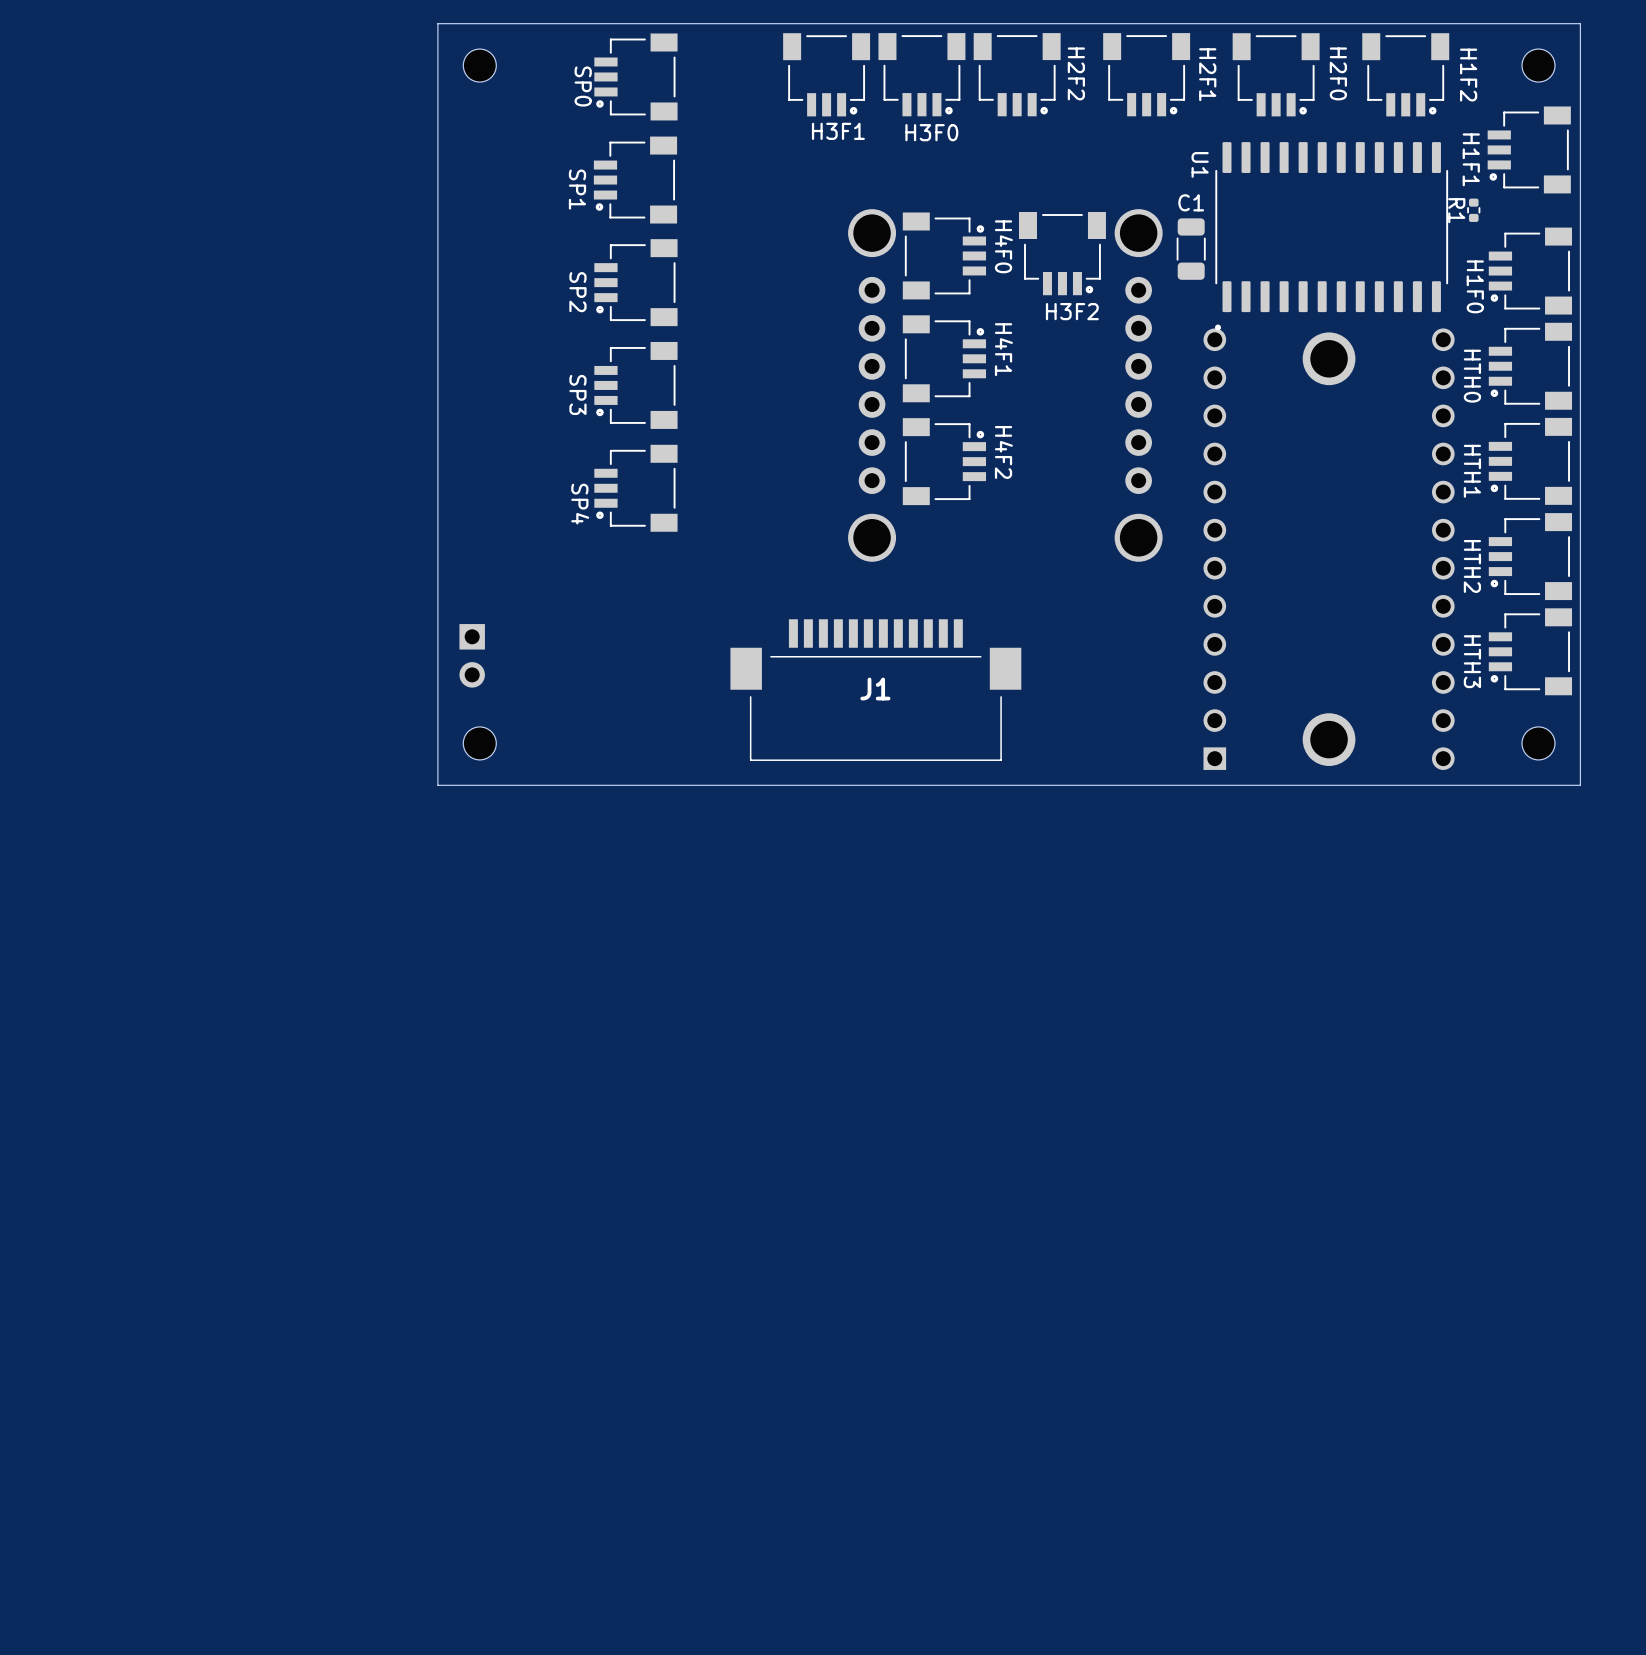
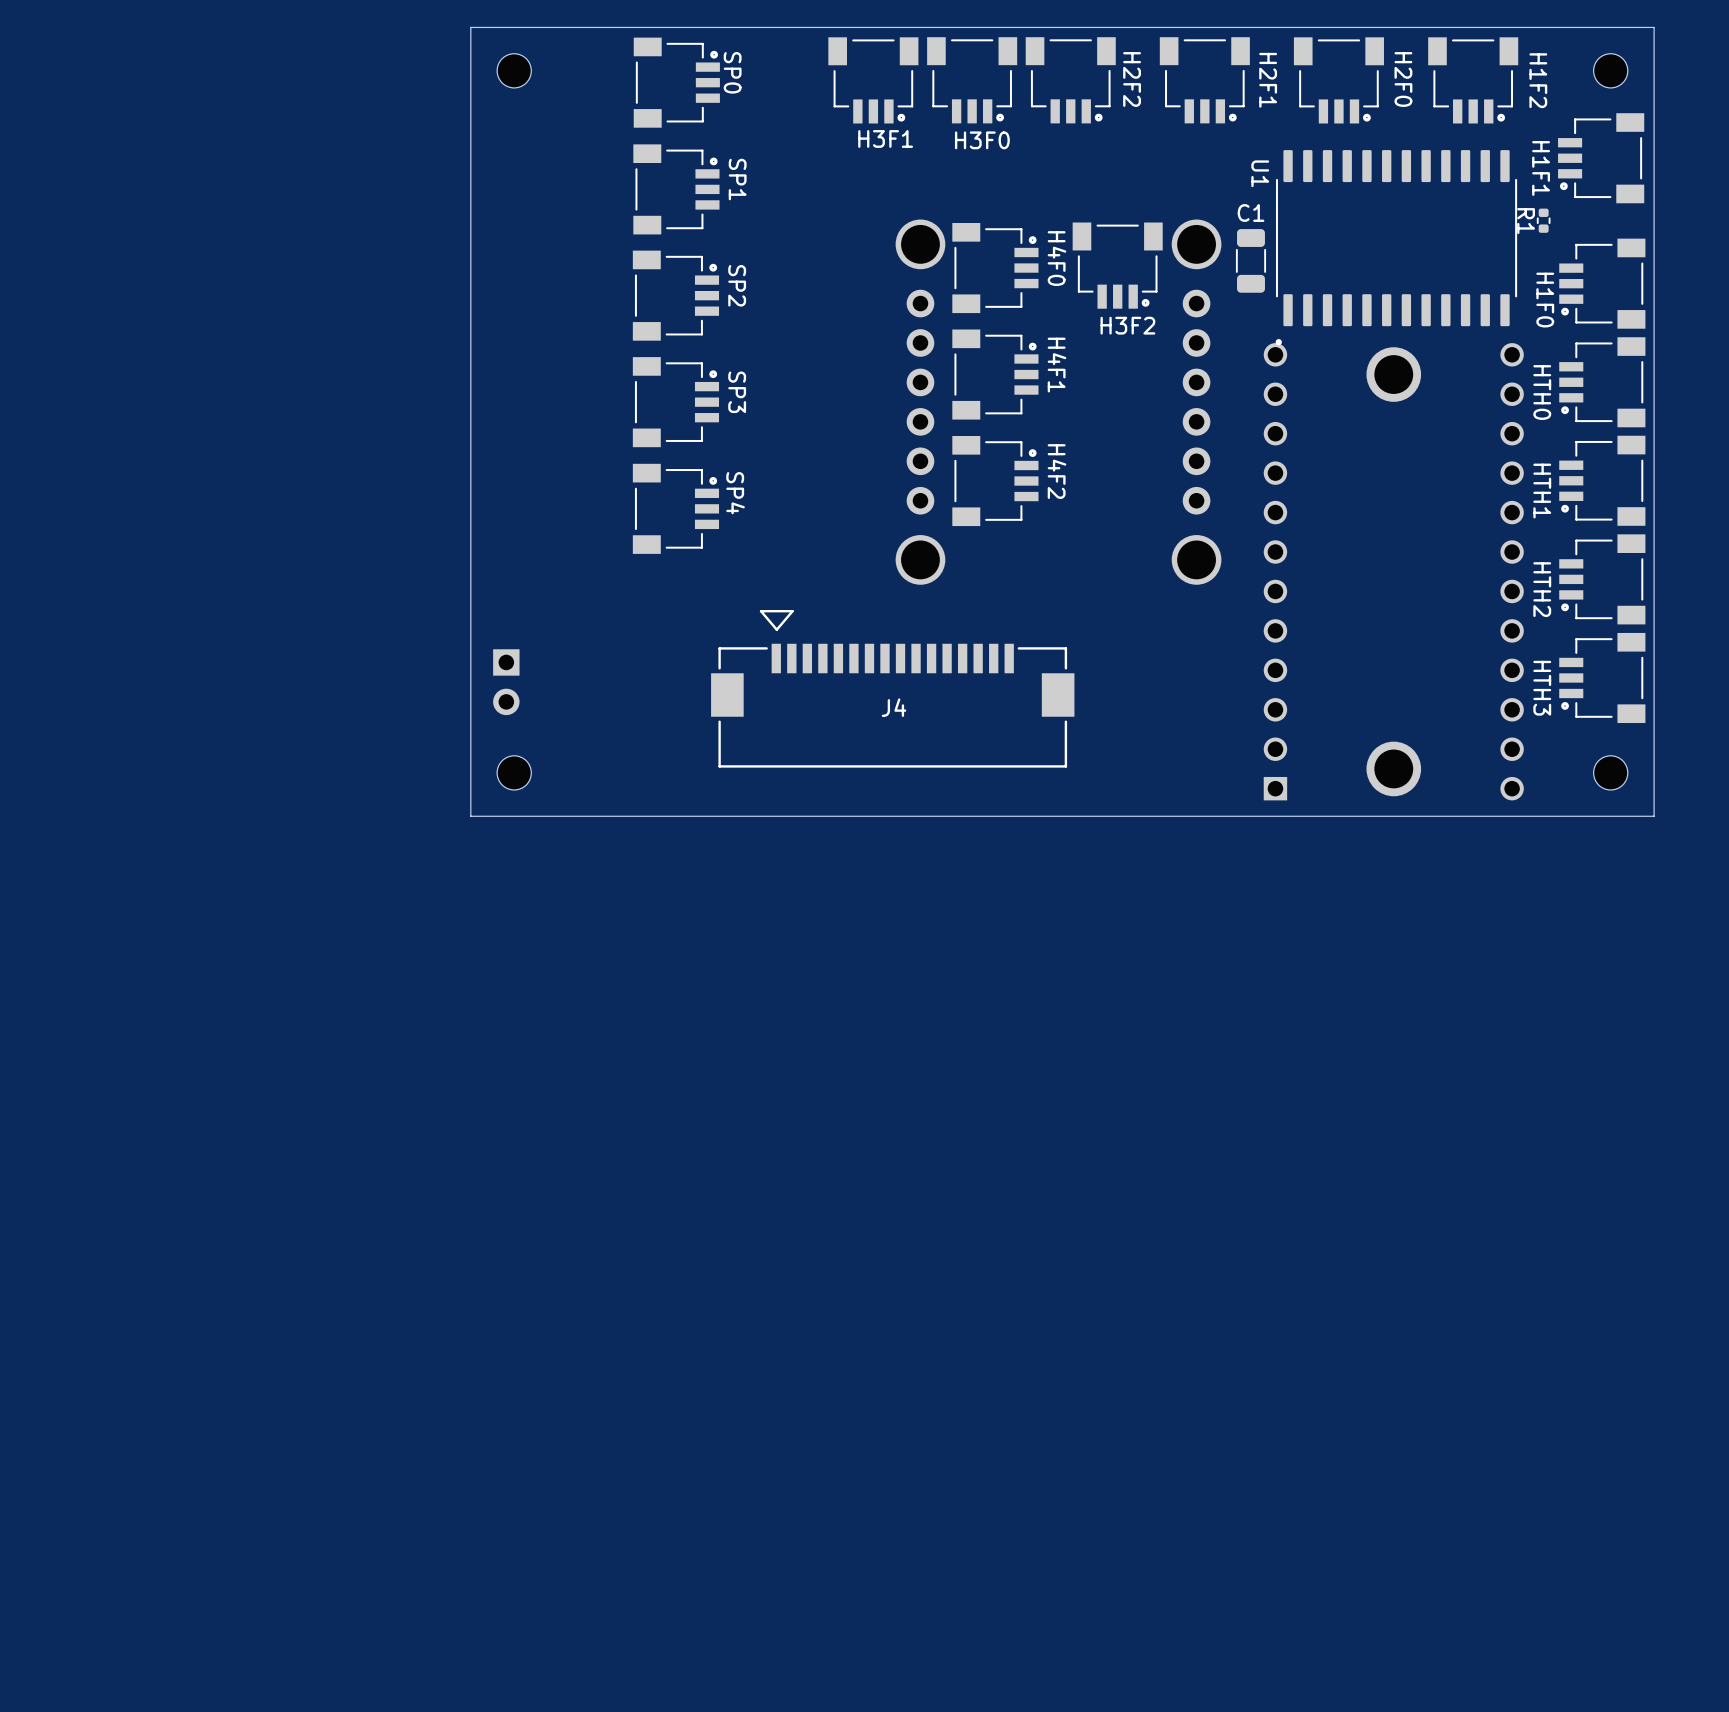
SP0 rotation: 0° (635, 76) -> 180° (676, 82)
SP1 rotation: 0° (635, 180) -> 180° (676, 189)
SP2 rotation: 0° (635, 282) -> 180° (675, 295)
SP3 rotation: 0° (635, 385) -> 180° (675, 402)
SP4 rotation: 0° (635, 488) -> 180° (675, 508)
J4: none -> (892, 688)
J1: (875, 690) -> none

